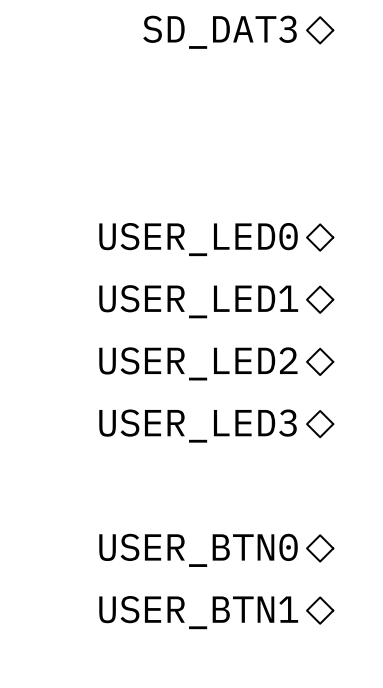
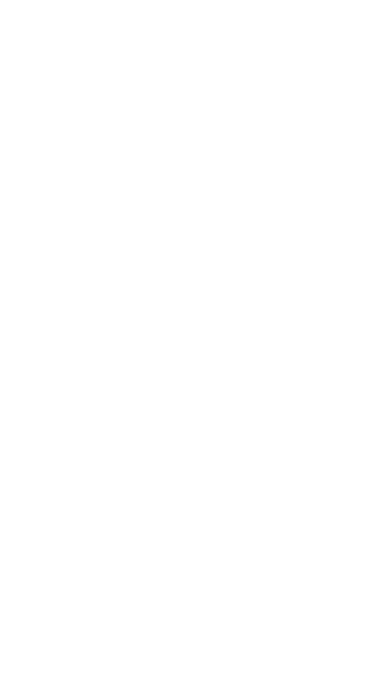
hierarchical label: SD_DAT3 (220, 32) -> none
hierarchical label: USER_LED0 (198, 239) -> none
hierarchical label: USER_LED1 (198, 301) -> none
hierarchical label: USER_LED2 (198, 363) -> none
hierarchical label: USER_LED3 (198, 426) -> none
hierarchical label: USER_BTN0 (198, 550) -> none
hierarchical label: USER_BTN1 (198, 612) -> none

